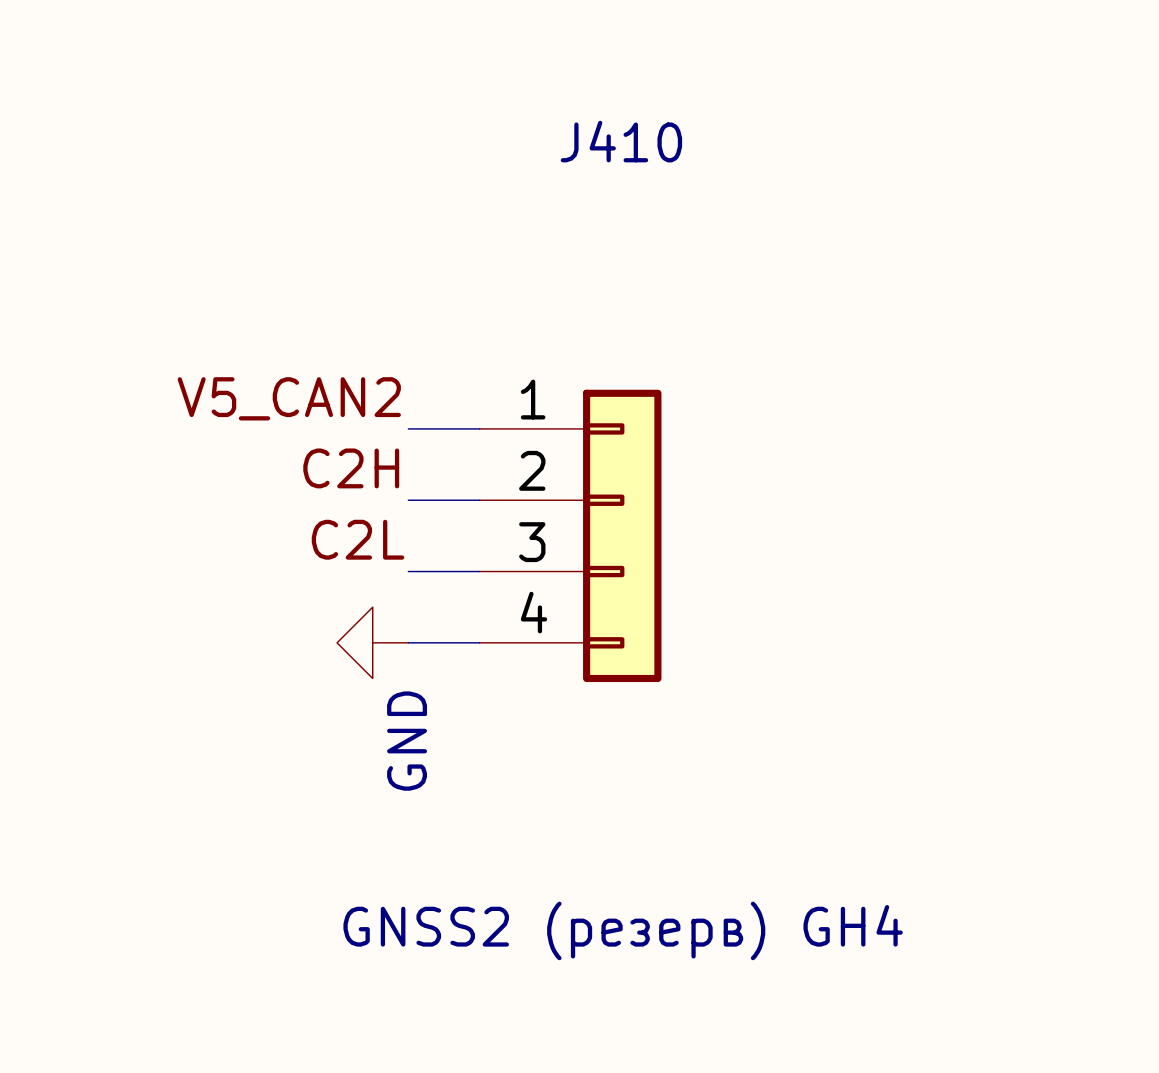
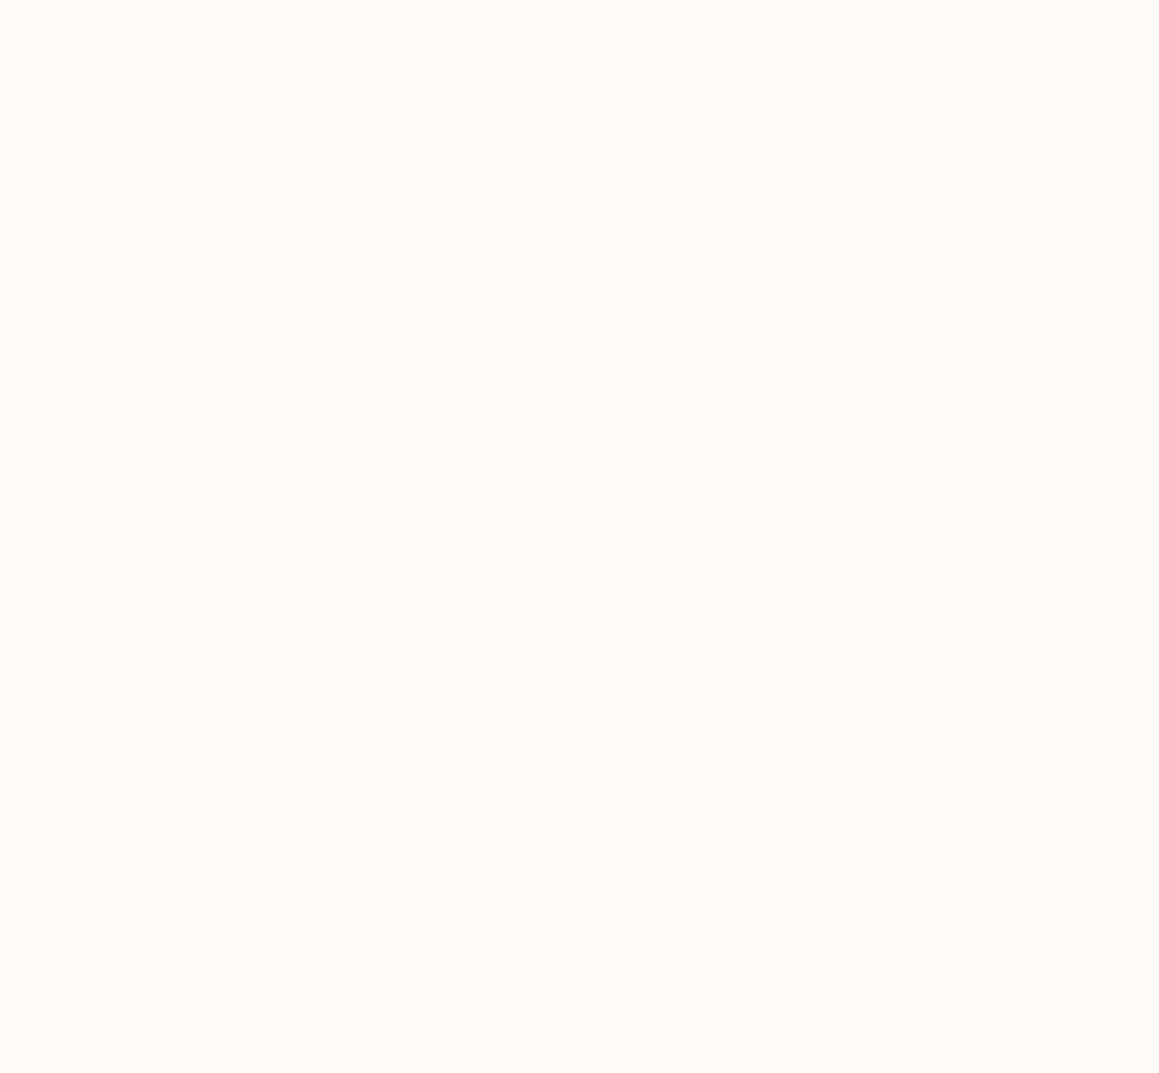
label: V5_CAN2 (289, 398) -> none
wire: (408, 428) (479, 428) -> none
label: C2H (351, 468) -> none
wire: (408, 500) (479, 500) -> none
J410: GNSS2 (резерв) GH4 (570, 535) -> none
label: C2L (358, 539) -> none
wire: (408, 571) (479, 571) -> none
power symbol: GND (372, 642) -> none
wire: (408, 642) (479, 642) -> none

